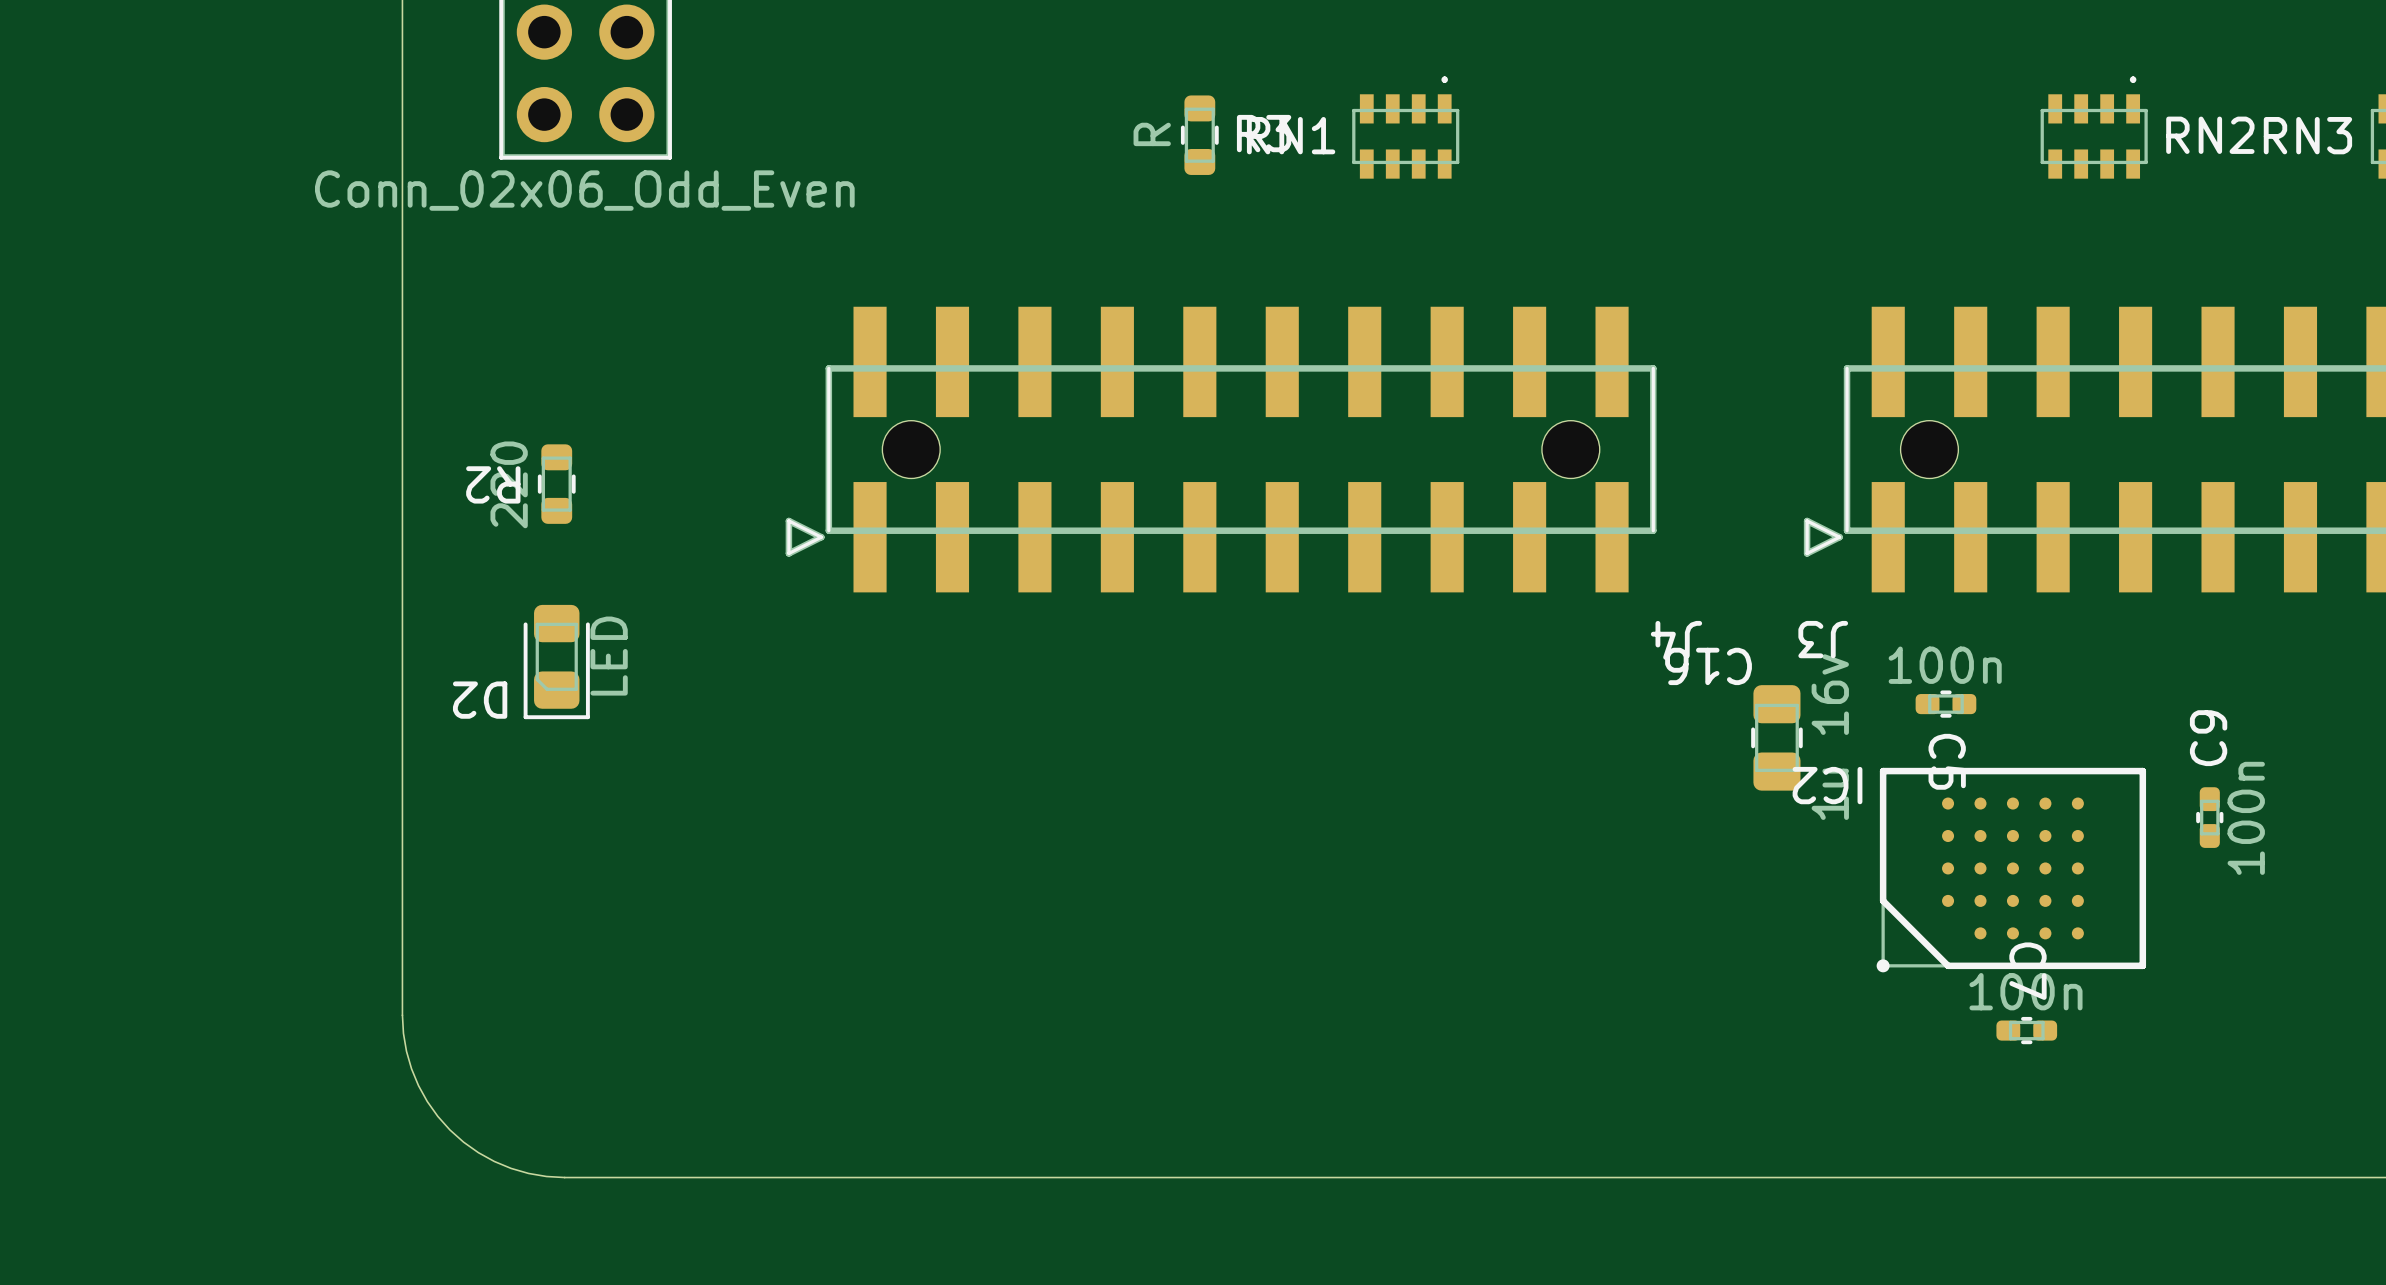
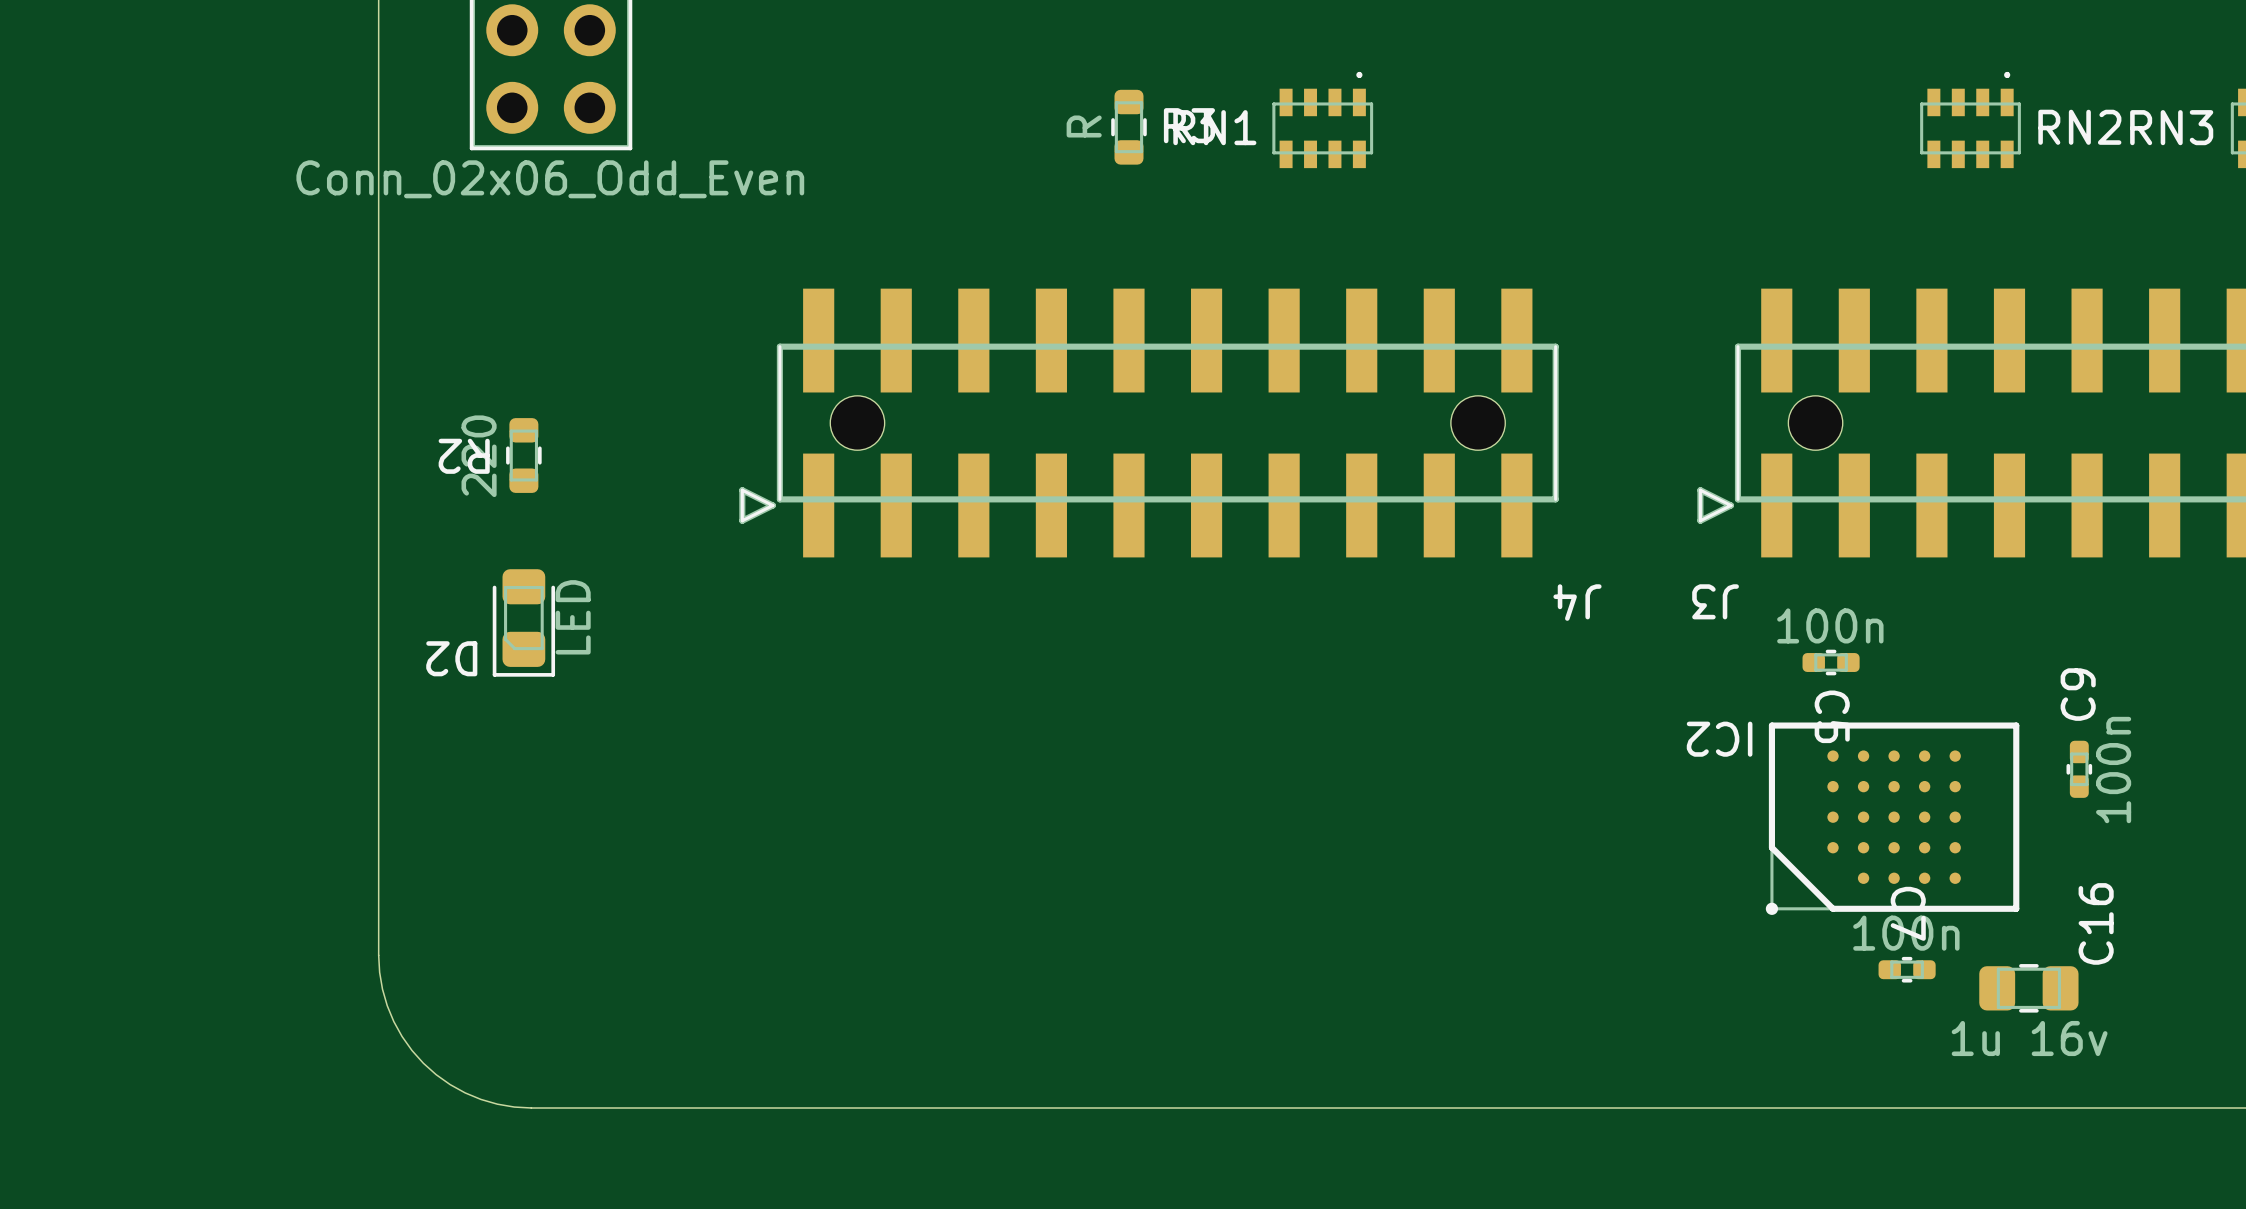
C16 rotation: 0° (1776, 737) -> 90° clockwise (2028, 988)
C16 position: (1776, 737) -> (2028, 988)

